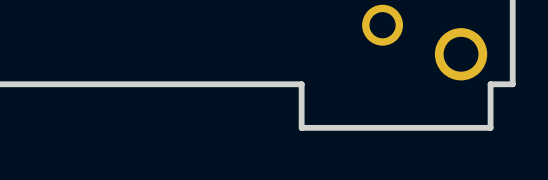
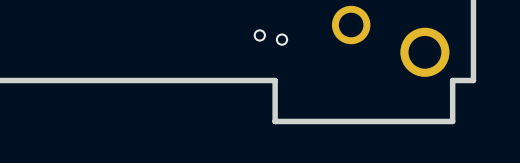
via: none -> (259, 35)
via: none -> (282, 39)

